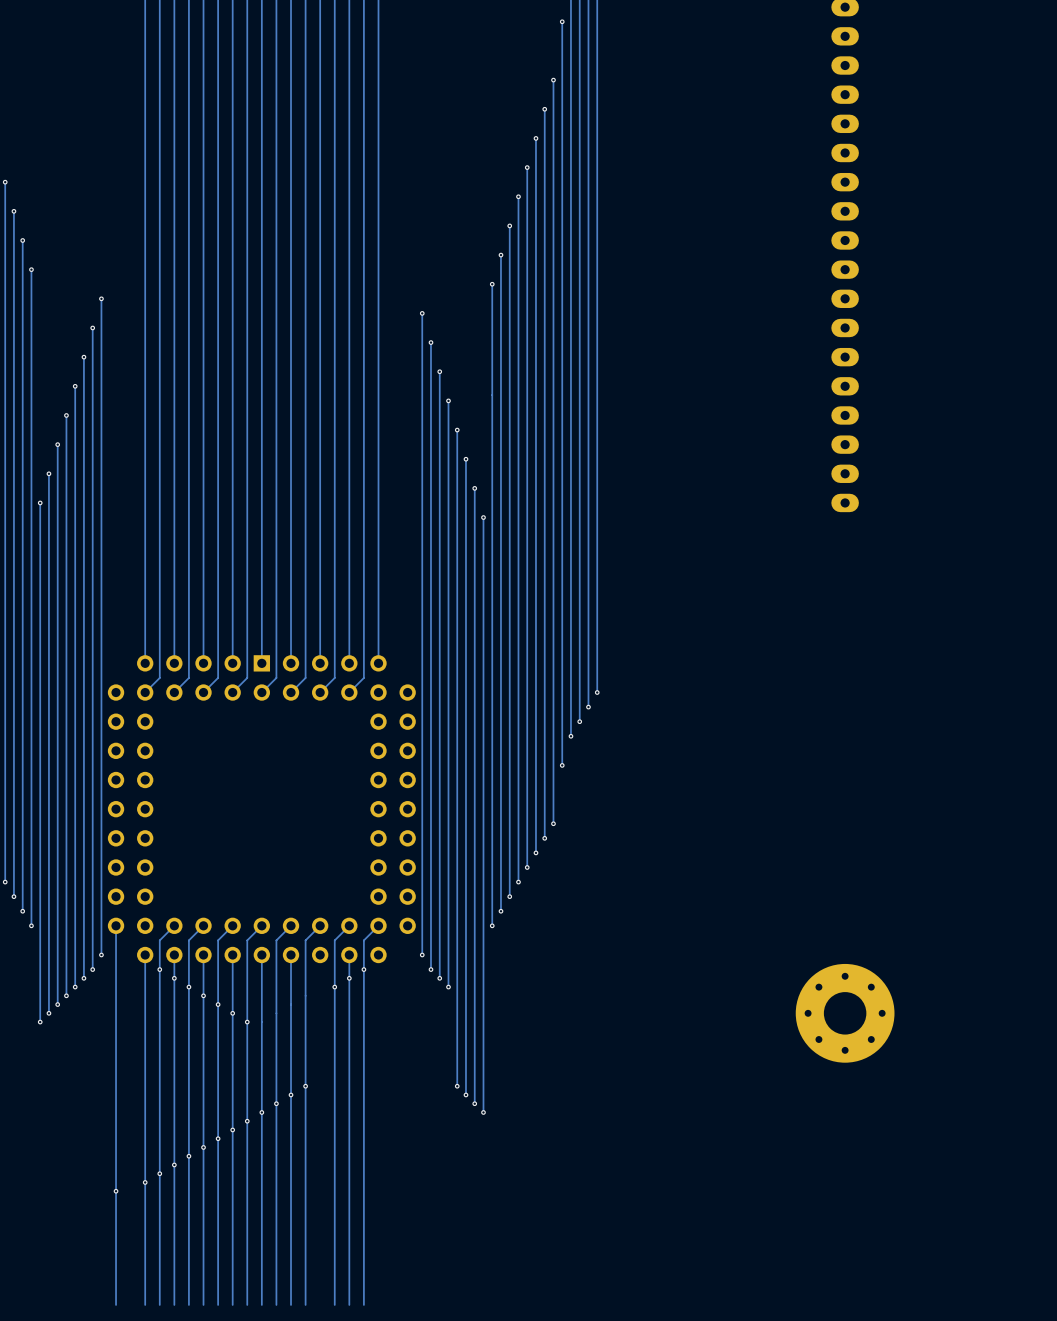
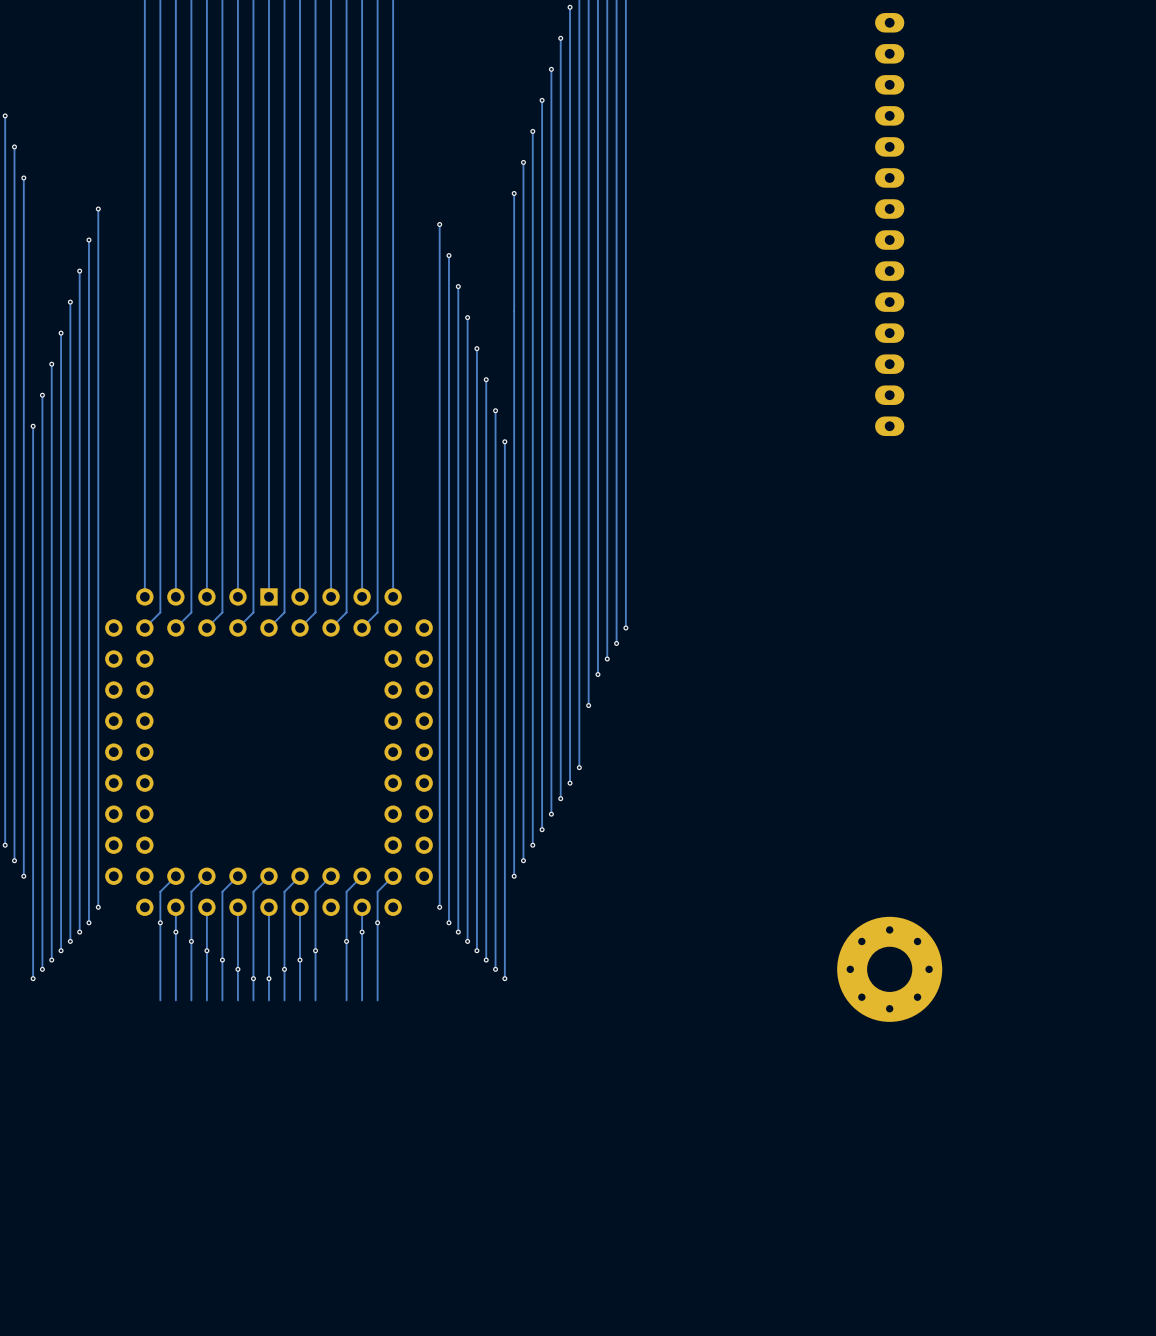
track: (116, 925) (116, 1304) -> none
track: (145, 954) (145, 1304) -> none
via: none -> (315, 950)
track: (457, 995) (457, 1086) -> none
via: none -> (476, 950)
via: none -> (300, 960)
track: (465, 1004) (465, 1094) -> none
via: none -> (486, 960)
via: none -> (284, 969)
track: (474, 1013) (474, 1103) -> none
via: none -> (495, 969)
via: none -> (268, 978)
track: (483, 1022) (483, 1112) -> none
via: none -> (504, 978)
track: (159, 1042) (159, 1304) -> none
track: (174, 1042) (174, 1304) -> none
track: (188, 1042) (188, 1304) -> none
track: (203, 1042) (203, 1304) -> none
track: (218, 1042) (218, 1304) -> none
track: (232, 1042) (232, 1304) -> none
track: (247, 1042) (247, 1304) -> none
track: (261, 1042) (261, 1304) -> none
track: (276, 1042) (276, 1304) -> none
track: (291, 1042) (291, 1304) -> none
track: (305, 1042) (305, 1304) -> none
track: (334, 1042) (334, 1304) -> none
track: (349, 1042) (349, 1304) -> none
track: (363, 1042) (363, 1304) -> none
via: (305, 1086) -> none
via: (457, 1086) -> none
via: (291, 1094) -> none
via: (465, 1094) -> none
via: (276, 1103) -> none
via: (474, 1103) -> none
via: (261, 1112) -> none
via: (483, 1112) -> none
via: (247, 1121) -> none
via: (232, 1129) -> none
via: (218, 1138) -> none
via: (203, 1147) -> none
via: (188, 1156) -> none
via: (174, 1164) -> none
via: (159, 1173) -> none
via: (145, 1182) -> none
via: (116, 1191) -> none

